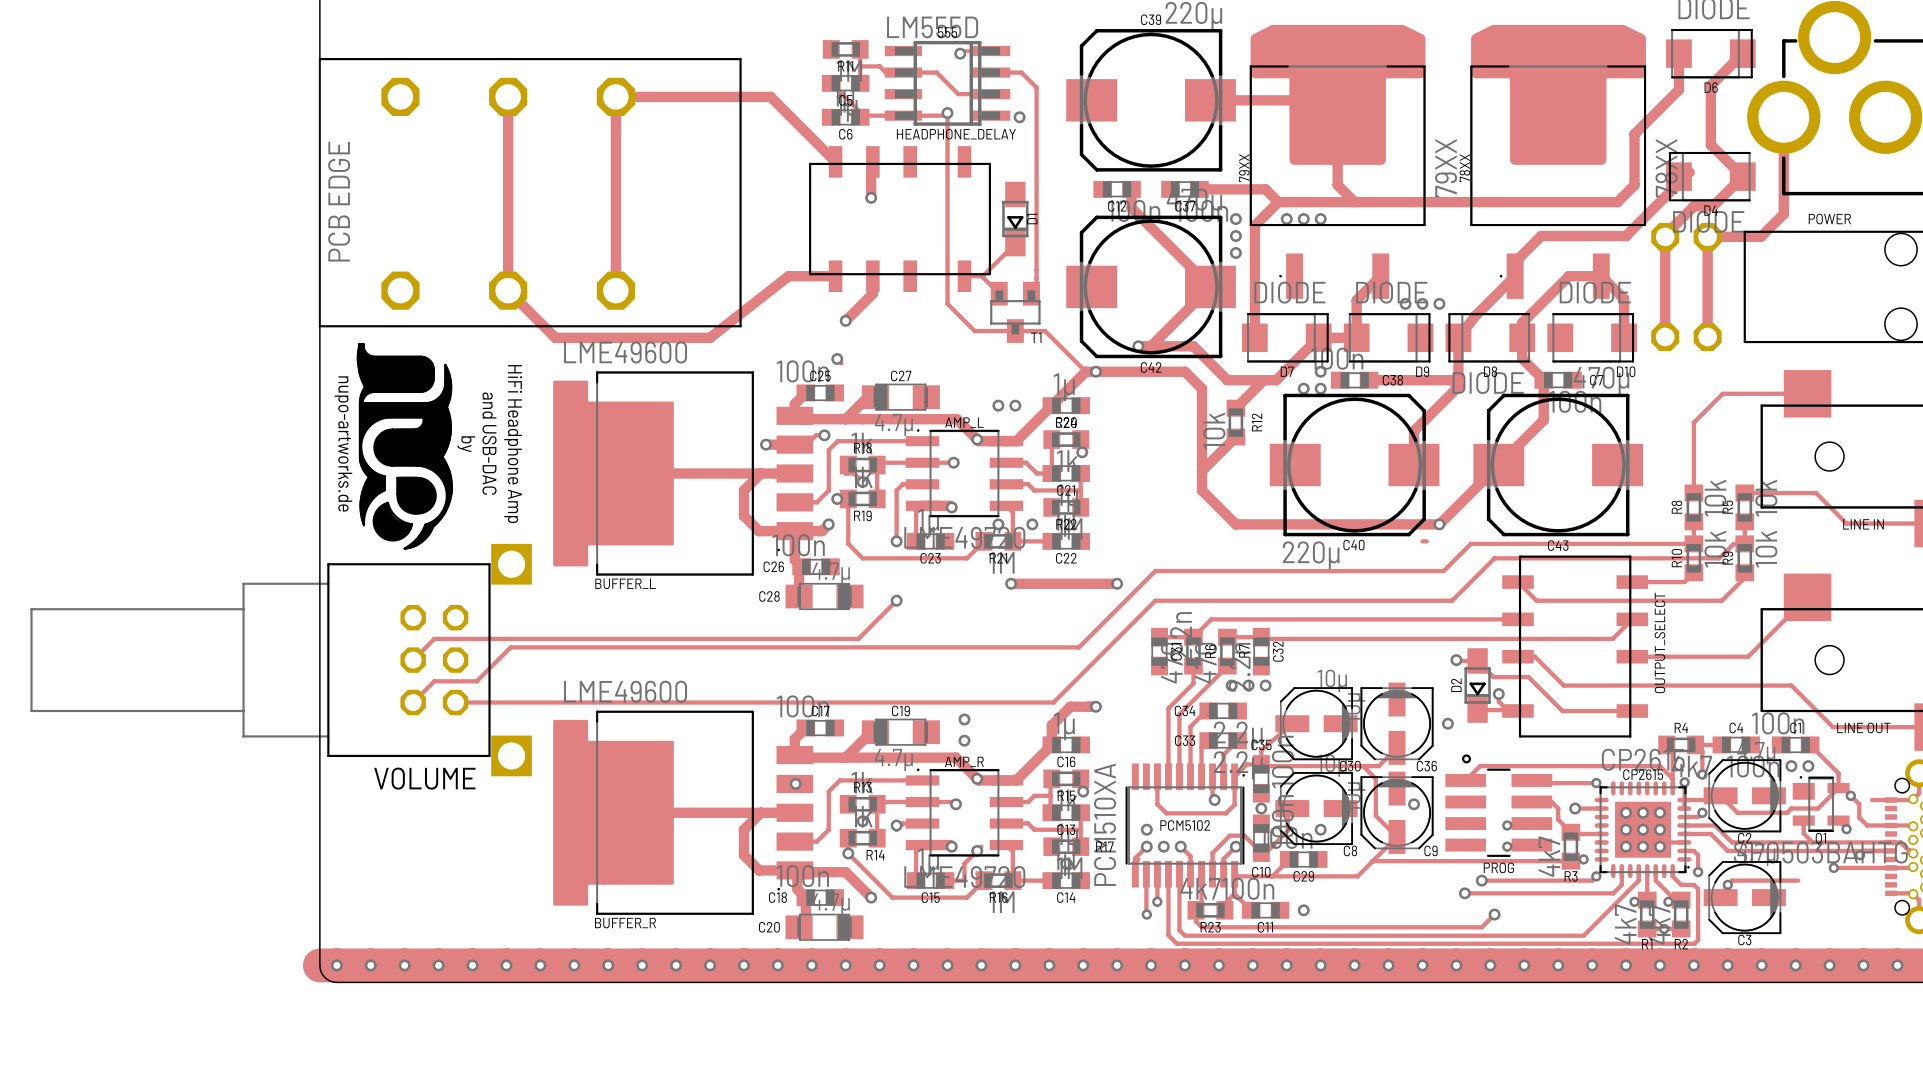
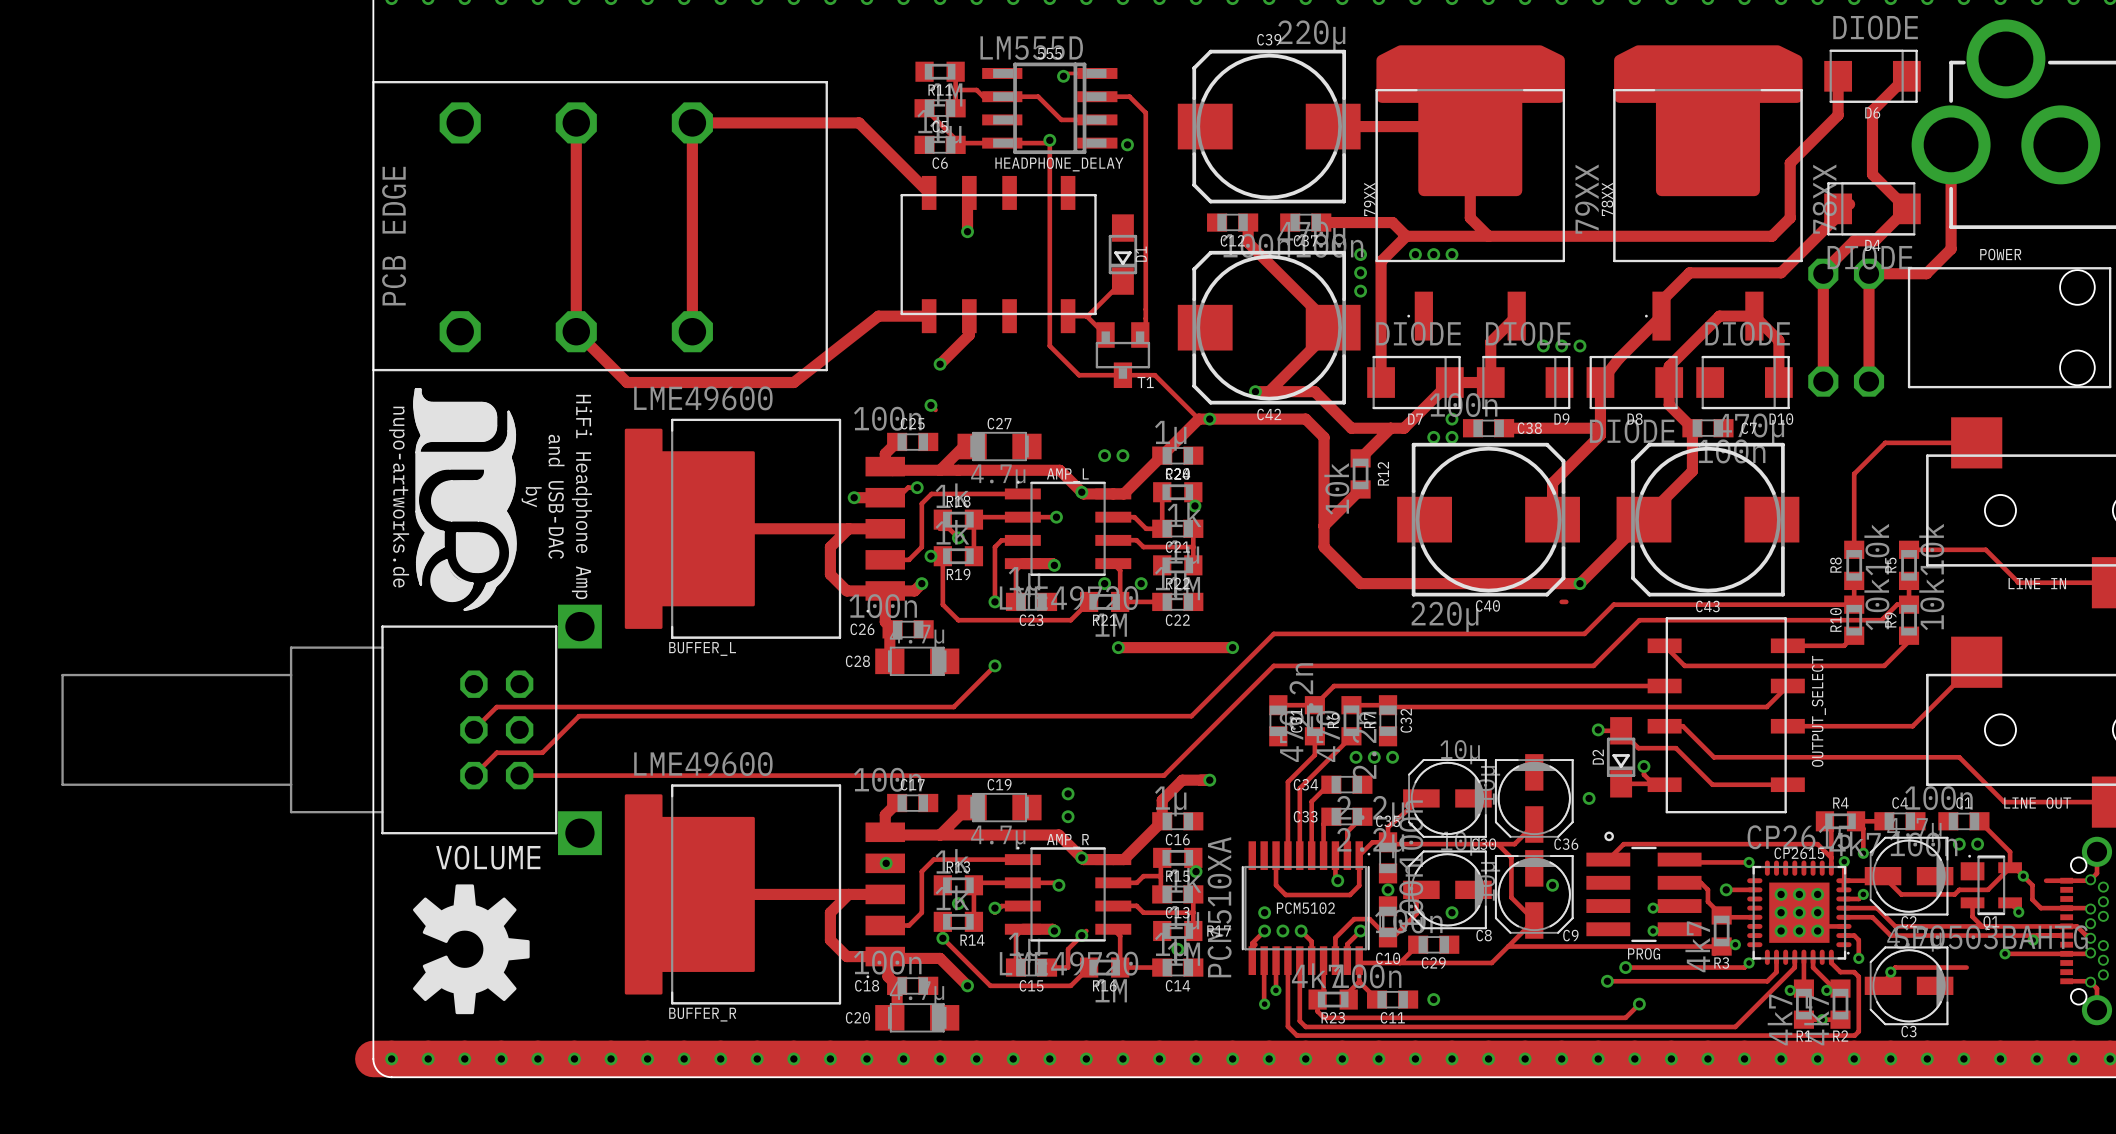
drawing: none -> [412, 884, 530, 1015]

